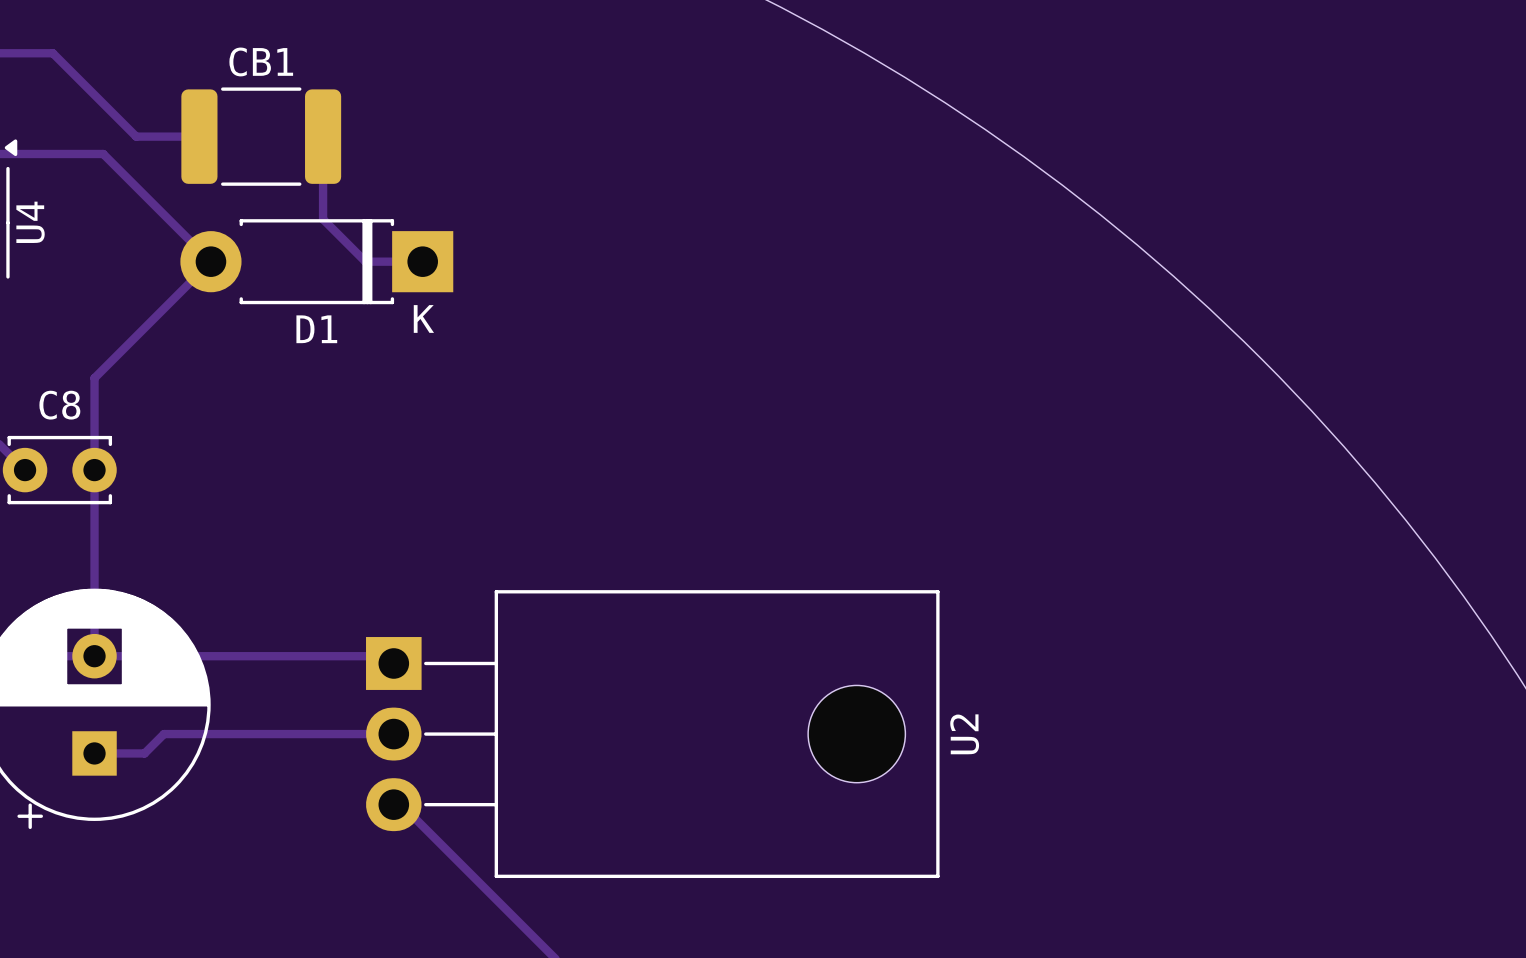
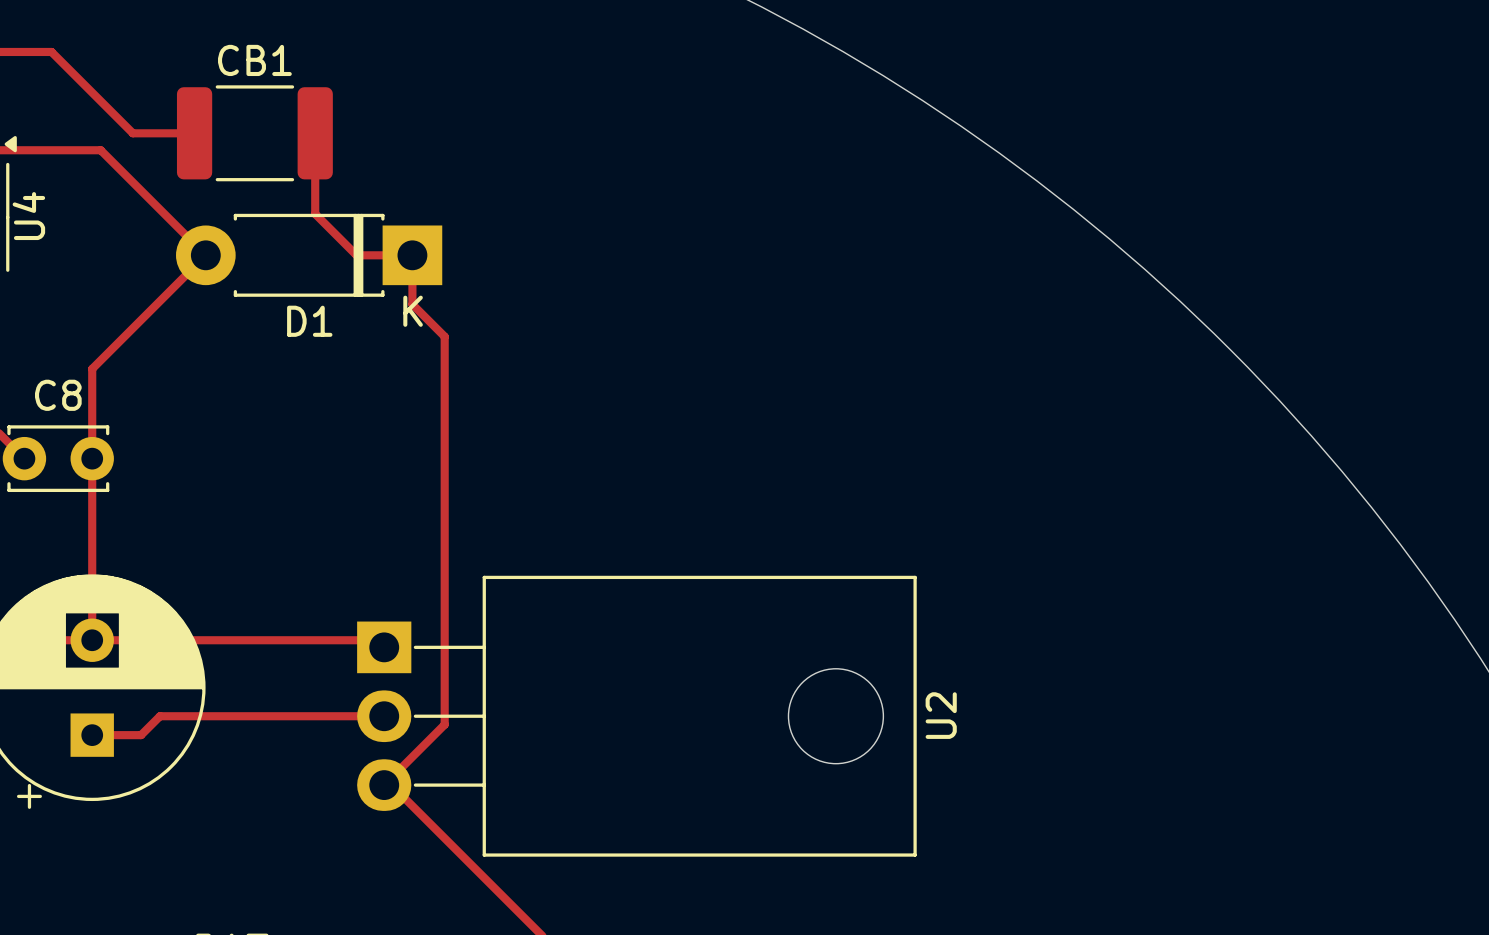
track: none -> (412, 255) (412, 304) (444, 336) (444, 724) (384, 785)

